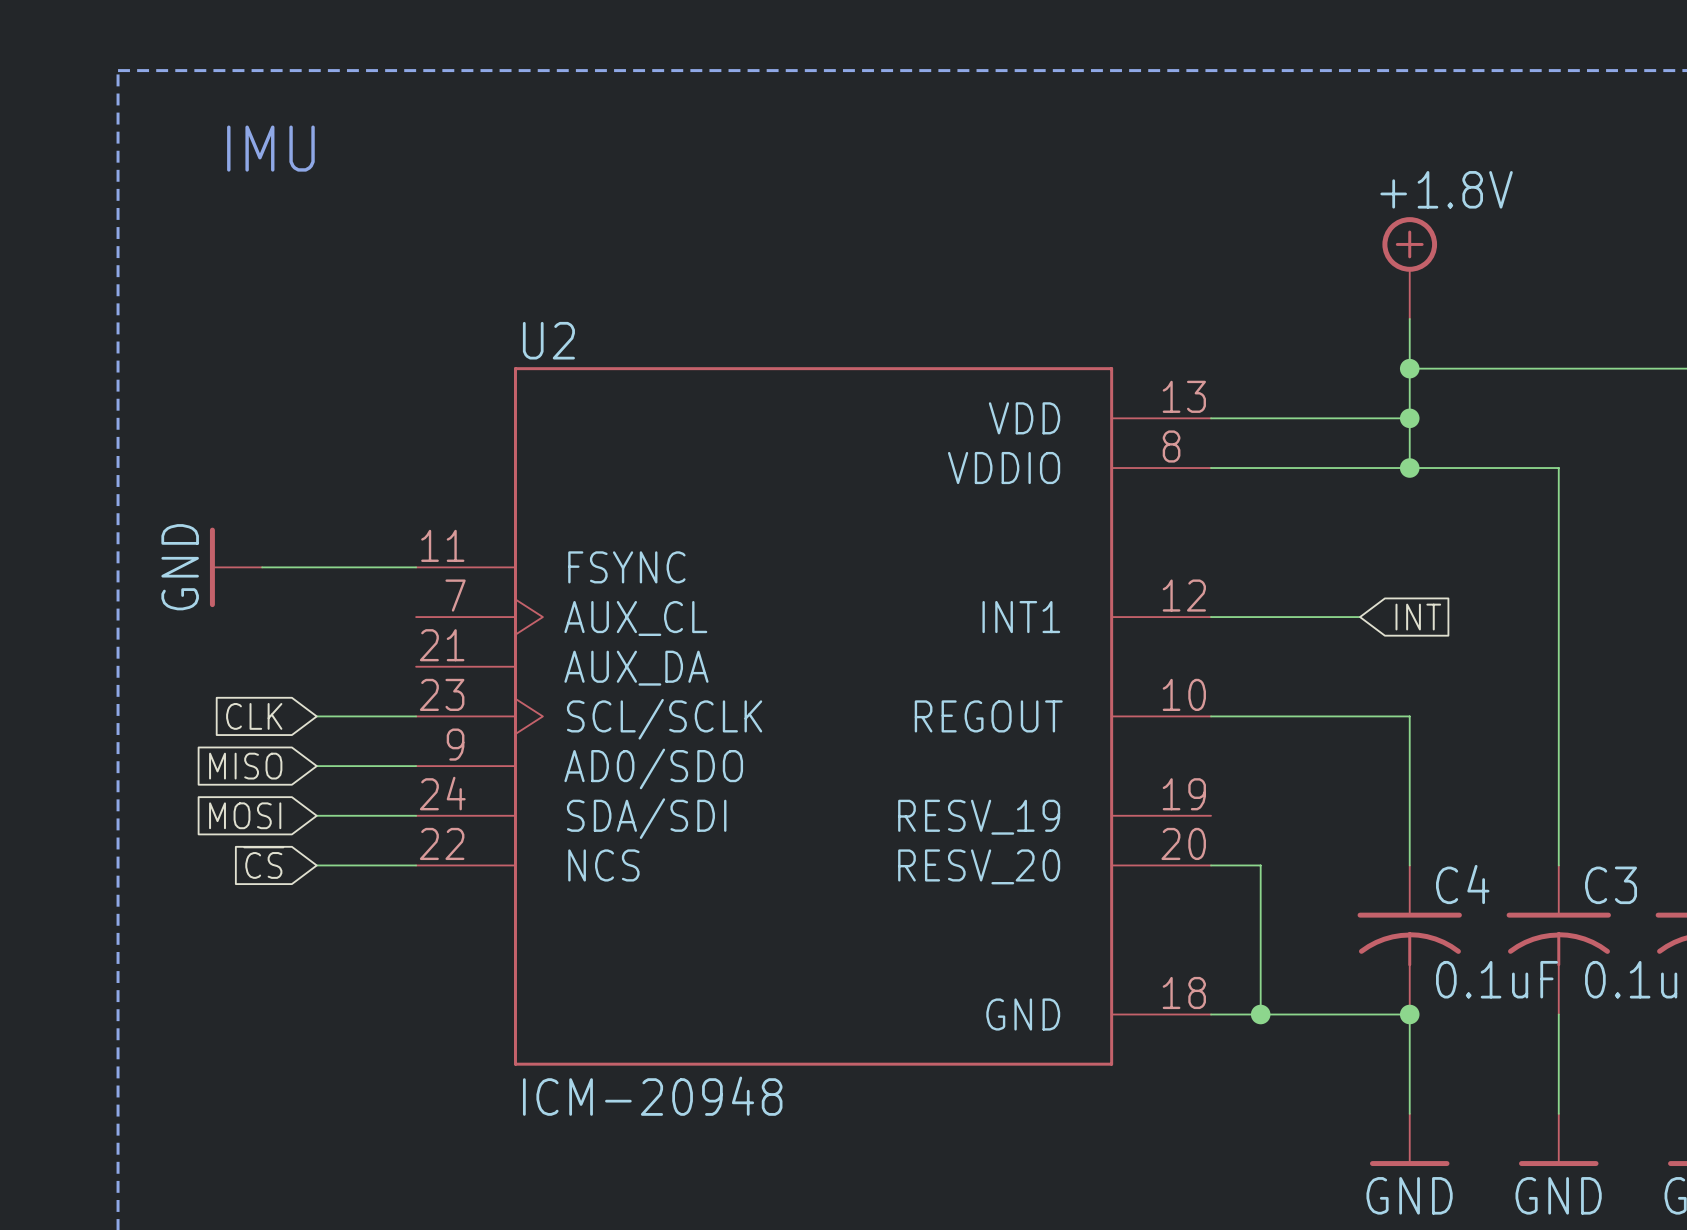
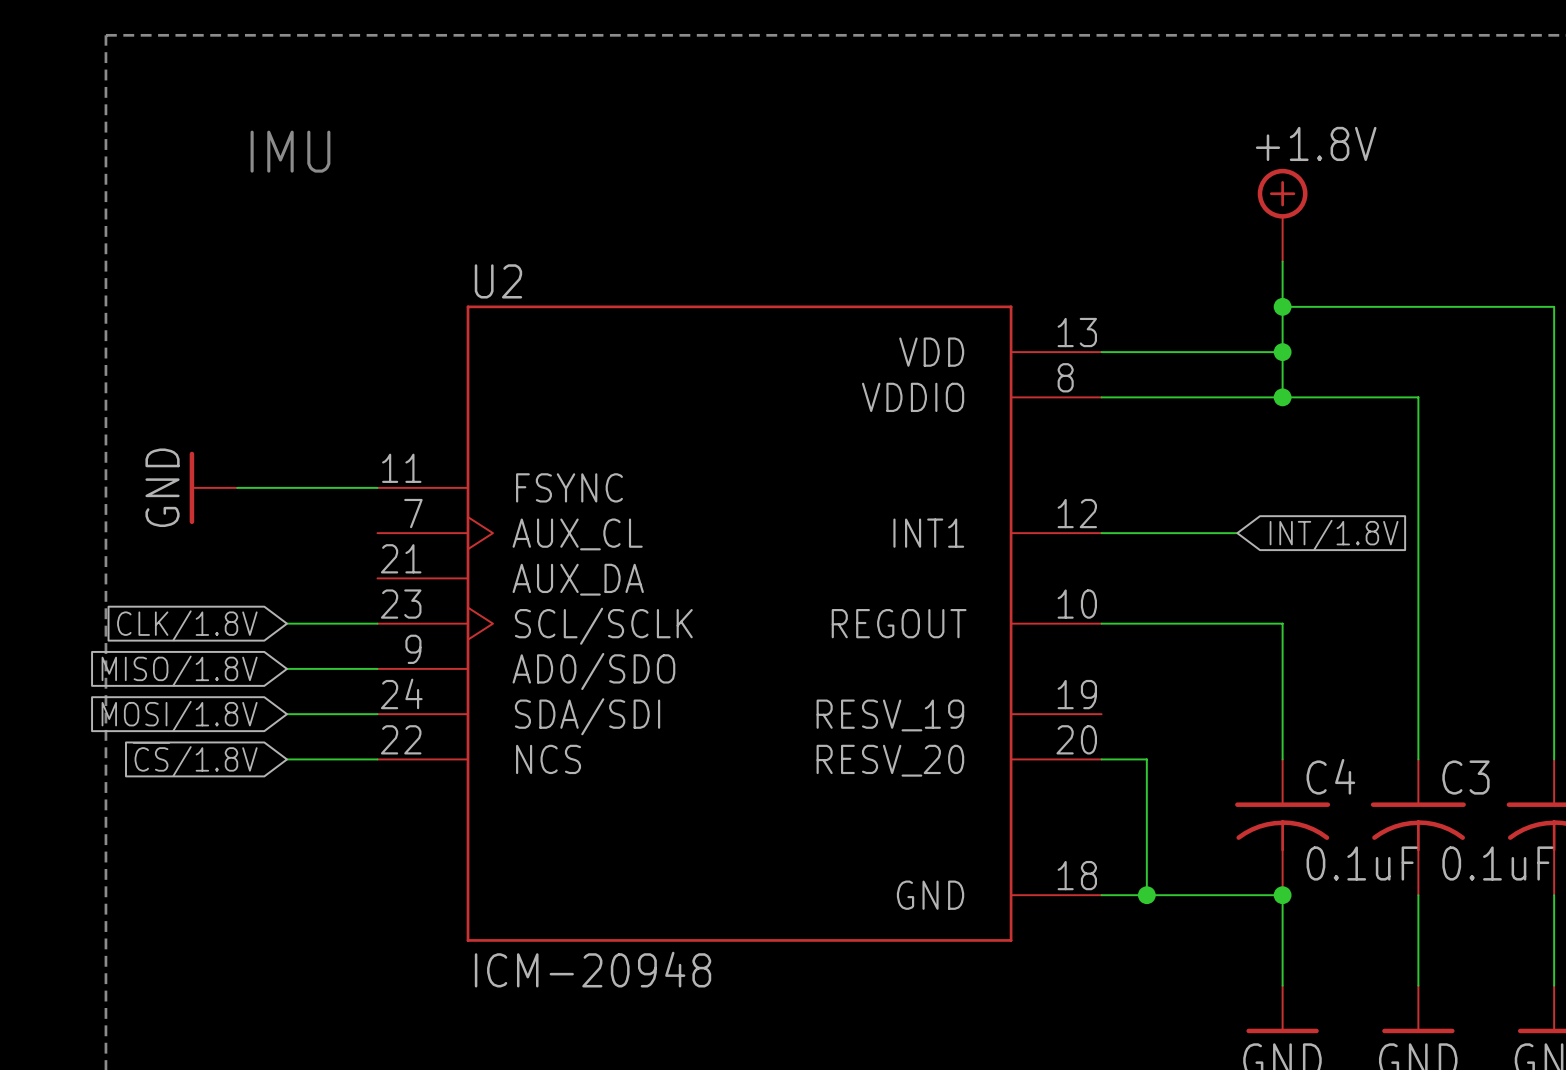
text position: IMU (270, 148) -> IMU (290, 151)
global label: INT (1418, 617) -> INT/1.8V (1334, 535)
global label: CLK (254, 716) -> CLK/1.8V (187, 625)
global label: MISO (245, 766) -> MISO/1.8V (179, 671)
global label: MOSI (245, 815) -> MOSI/1.8V (179, 716)
global label: ~{CS} (263, 862) -> ~{CS}/1.8V (195, 759)

